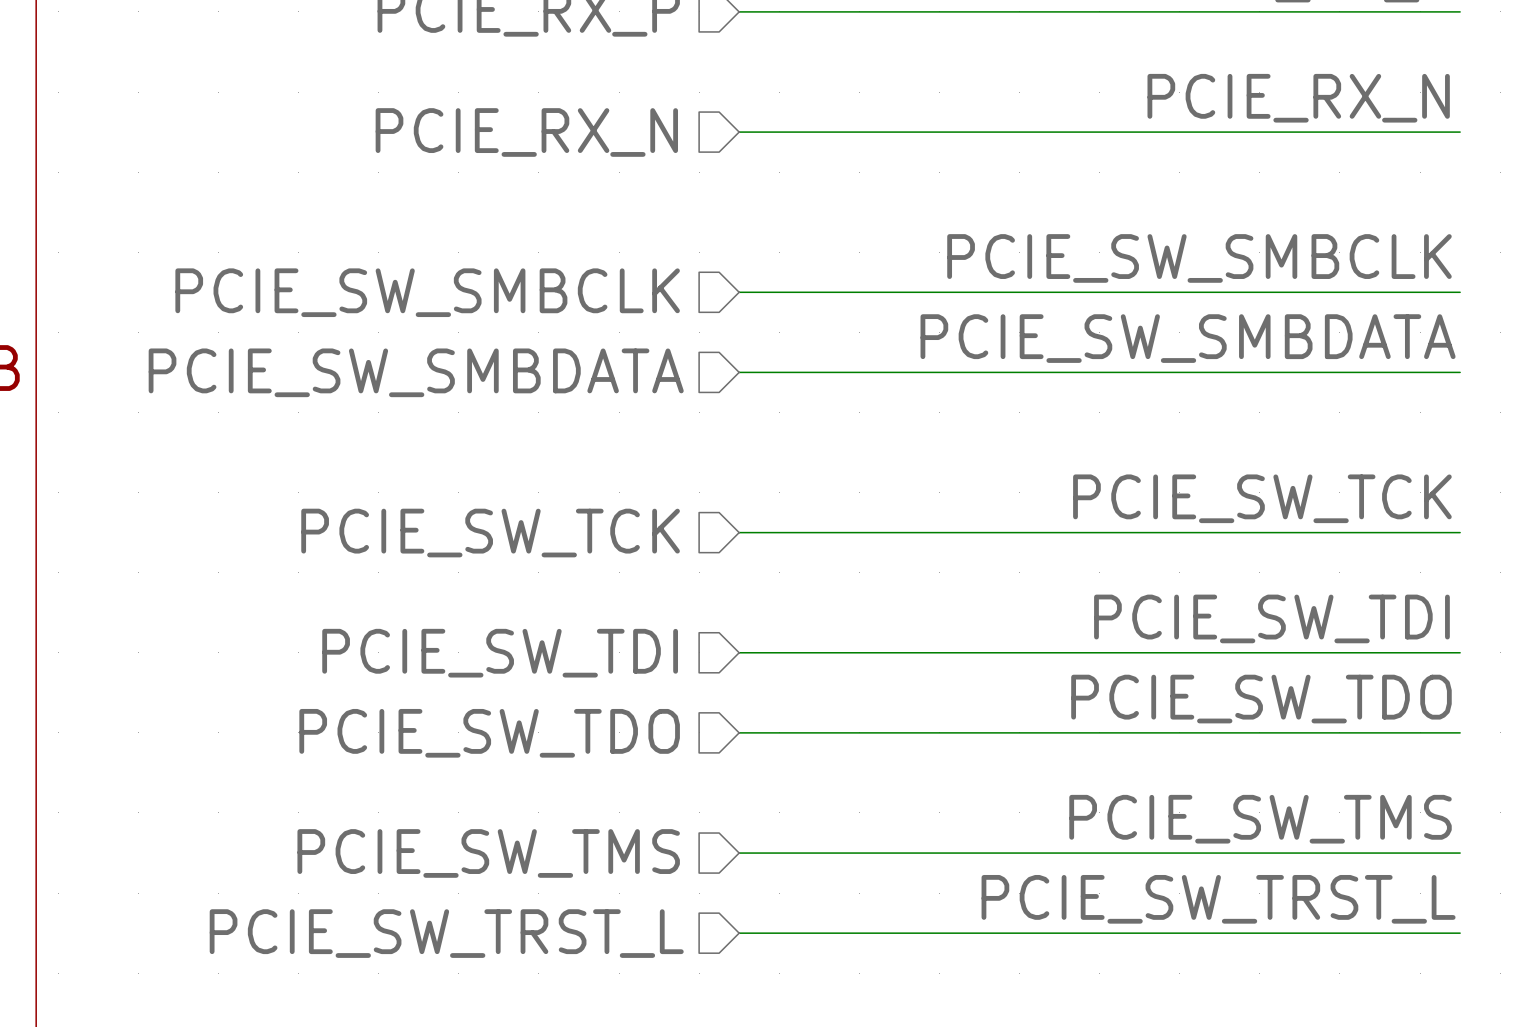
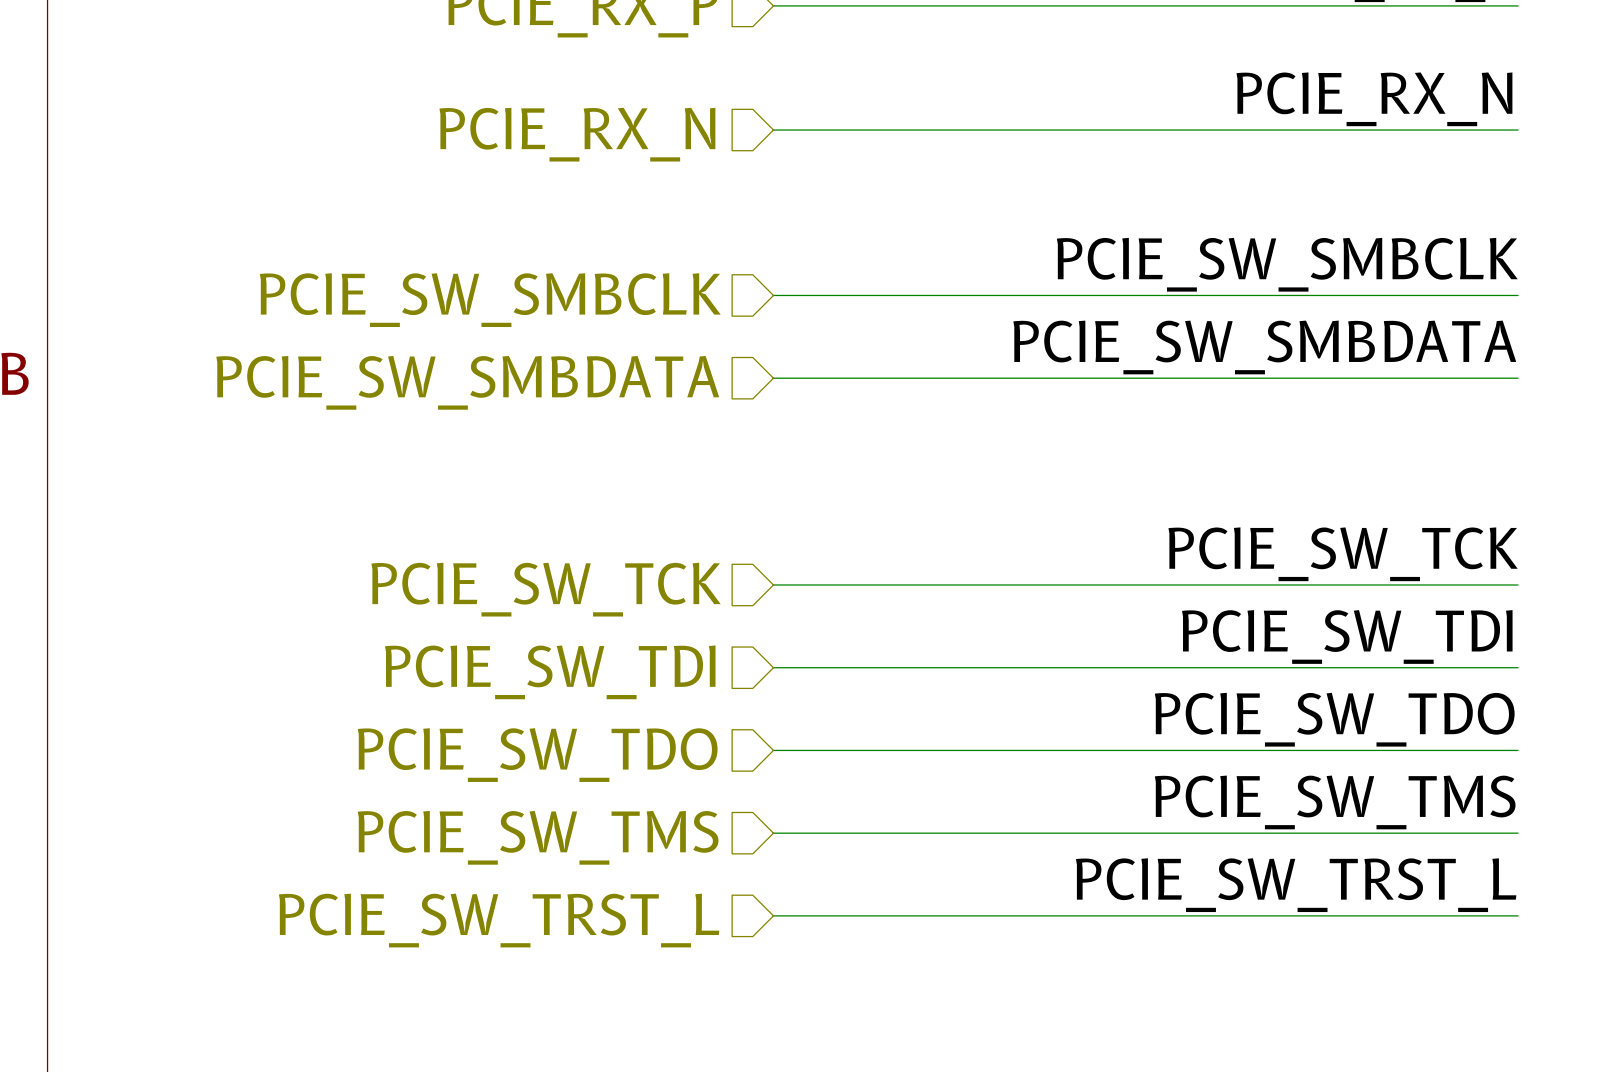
label position: PCIE_SW_TCK (1262, 498) -> PCIE_SW_TCK (1343, 554)
wire: (739, 532) (1460, 532) -> (773, 585) (1517, 585)
hierarchical label position: PCIE_SW_TCK (490, 533) -> PCIE_SW_TCK (546, 589)
label position: PCIE_SW_TMS (1260, 819) -> PCIE_SW_TMS (1335, 802)
hierarchical label position: PCIE_SW_TMS (488, 853) -> PCIE_SW_TMS (538, 837)
wire: (739, 853) (1460, 853) -> (773, 833) (1517, 833)
label position: PCIE_SW_TRST_L (1218, 899) -> PCIE_SW_TRST_L (1296, 885)
hierarchical label position: PCIE_SW_TRST_L (446, 933) -> PCIE_SW_TRST_L (499, 920)
wire: (739, 933) (1460, 933) -> (773, 915) (1517, 915)

